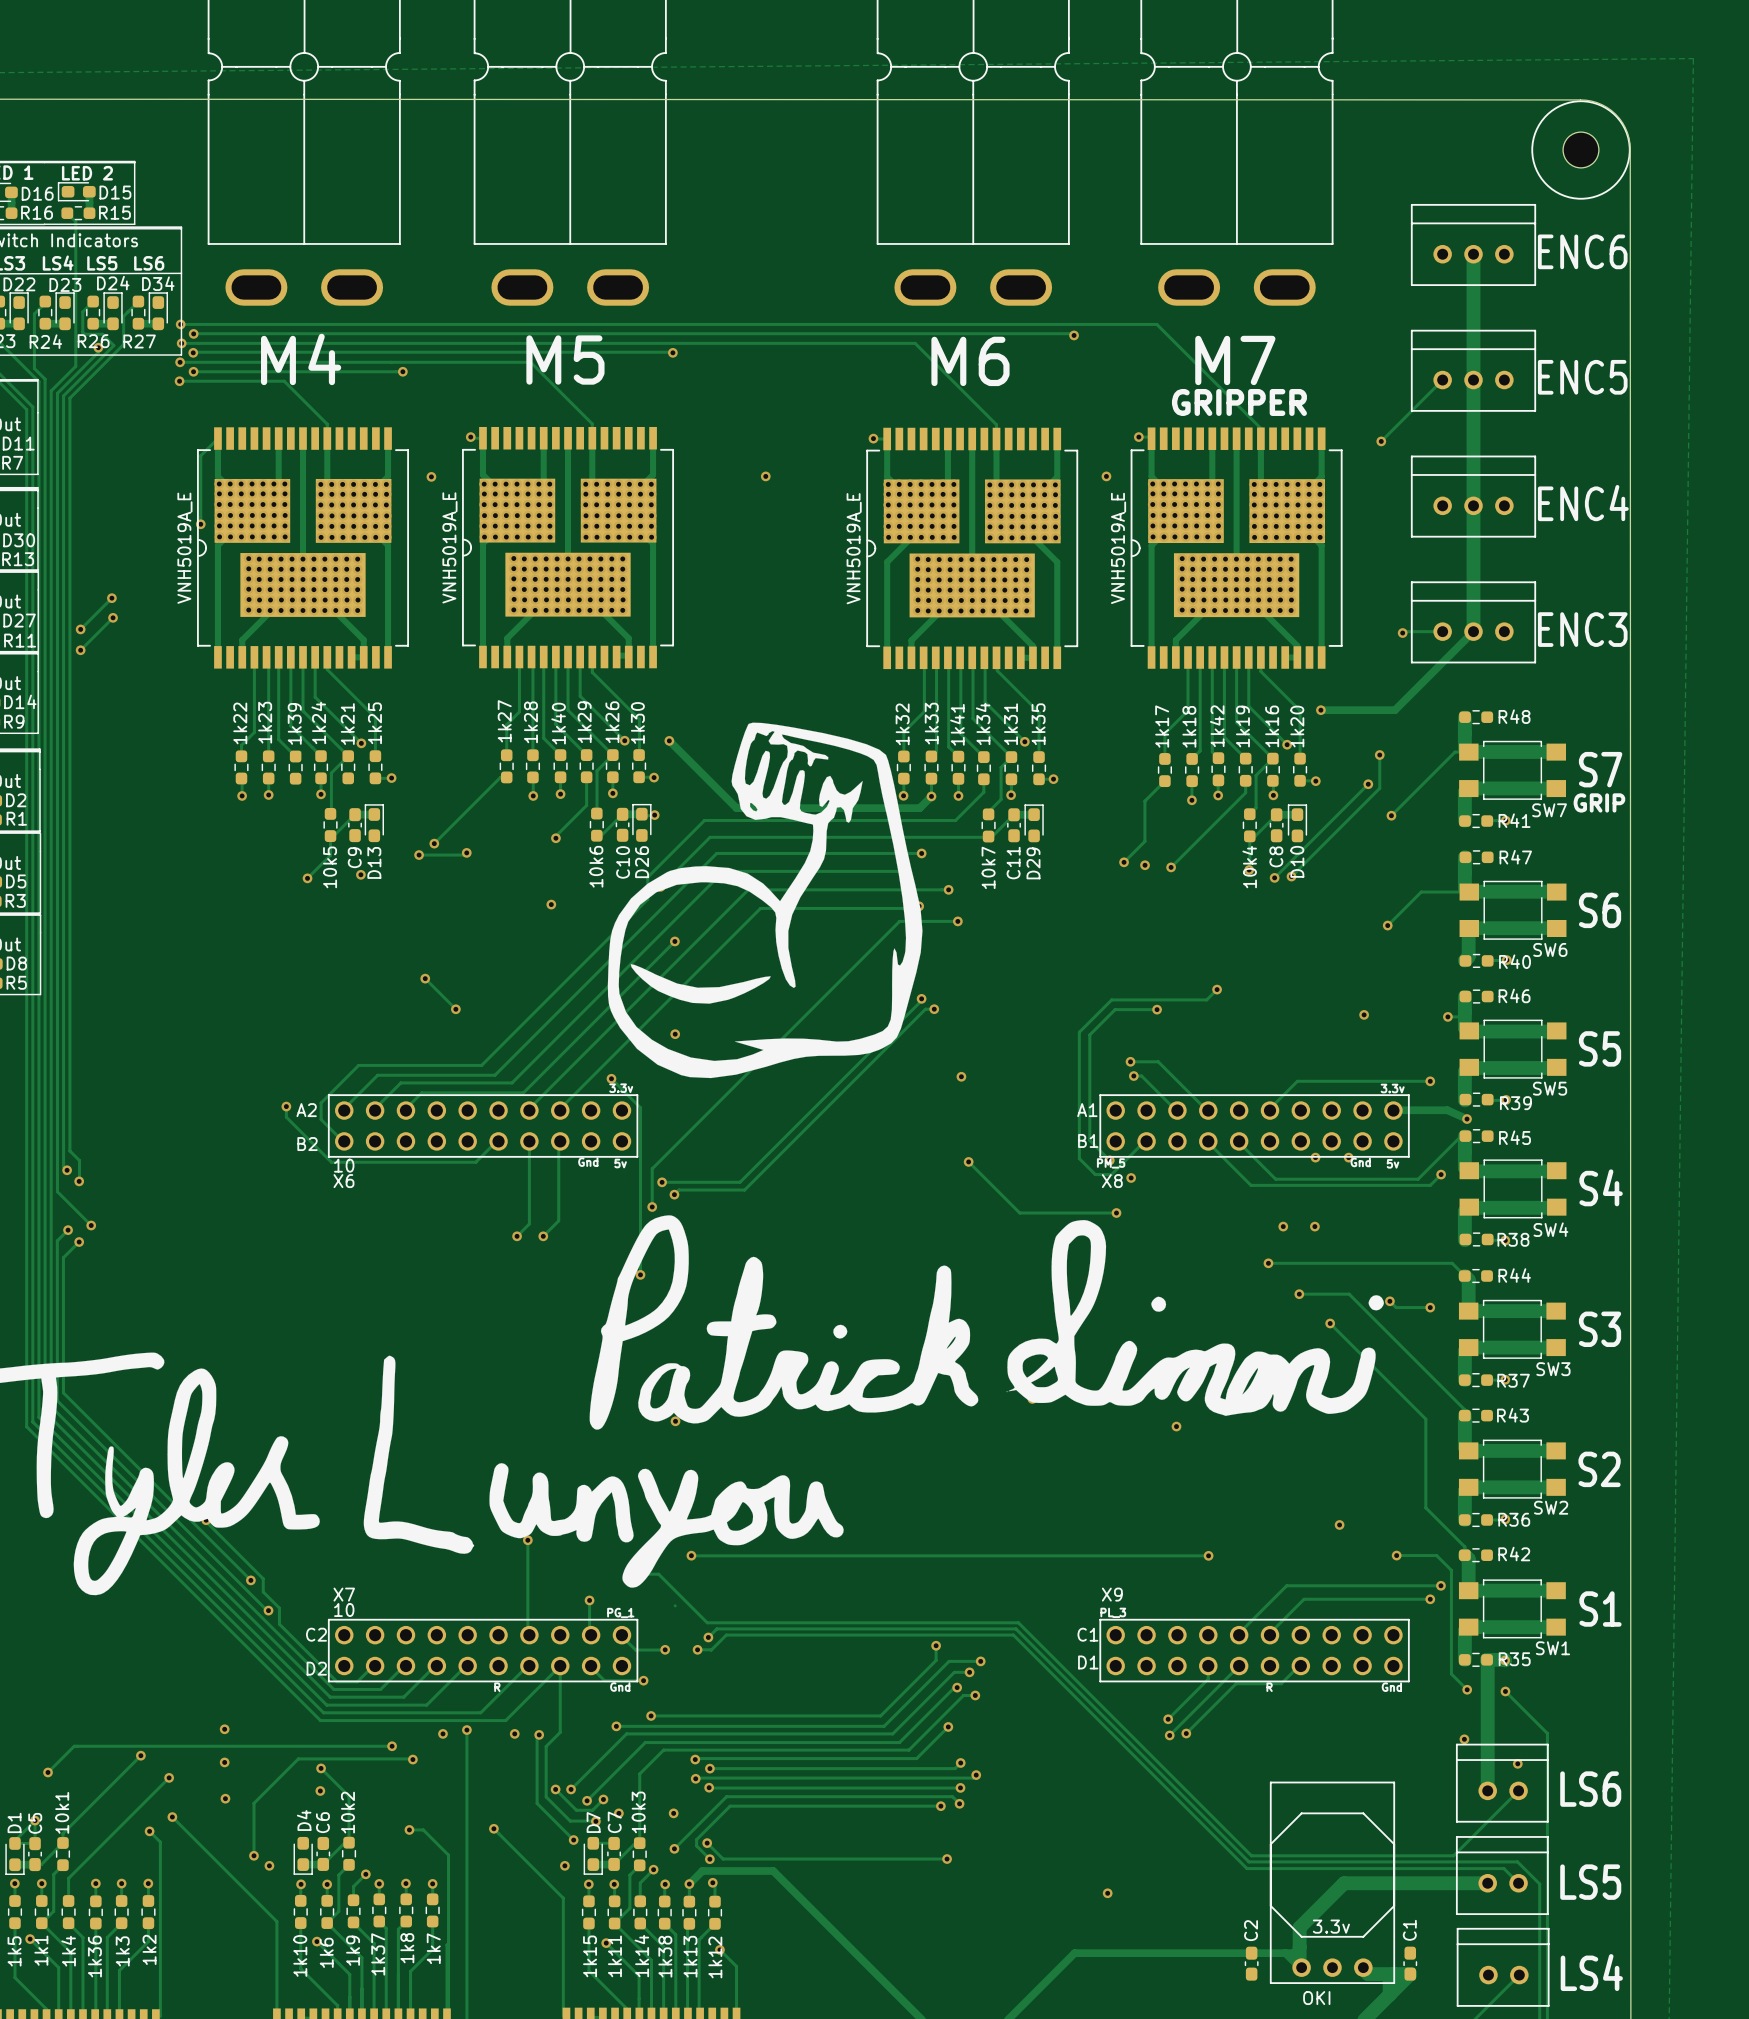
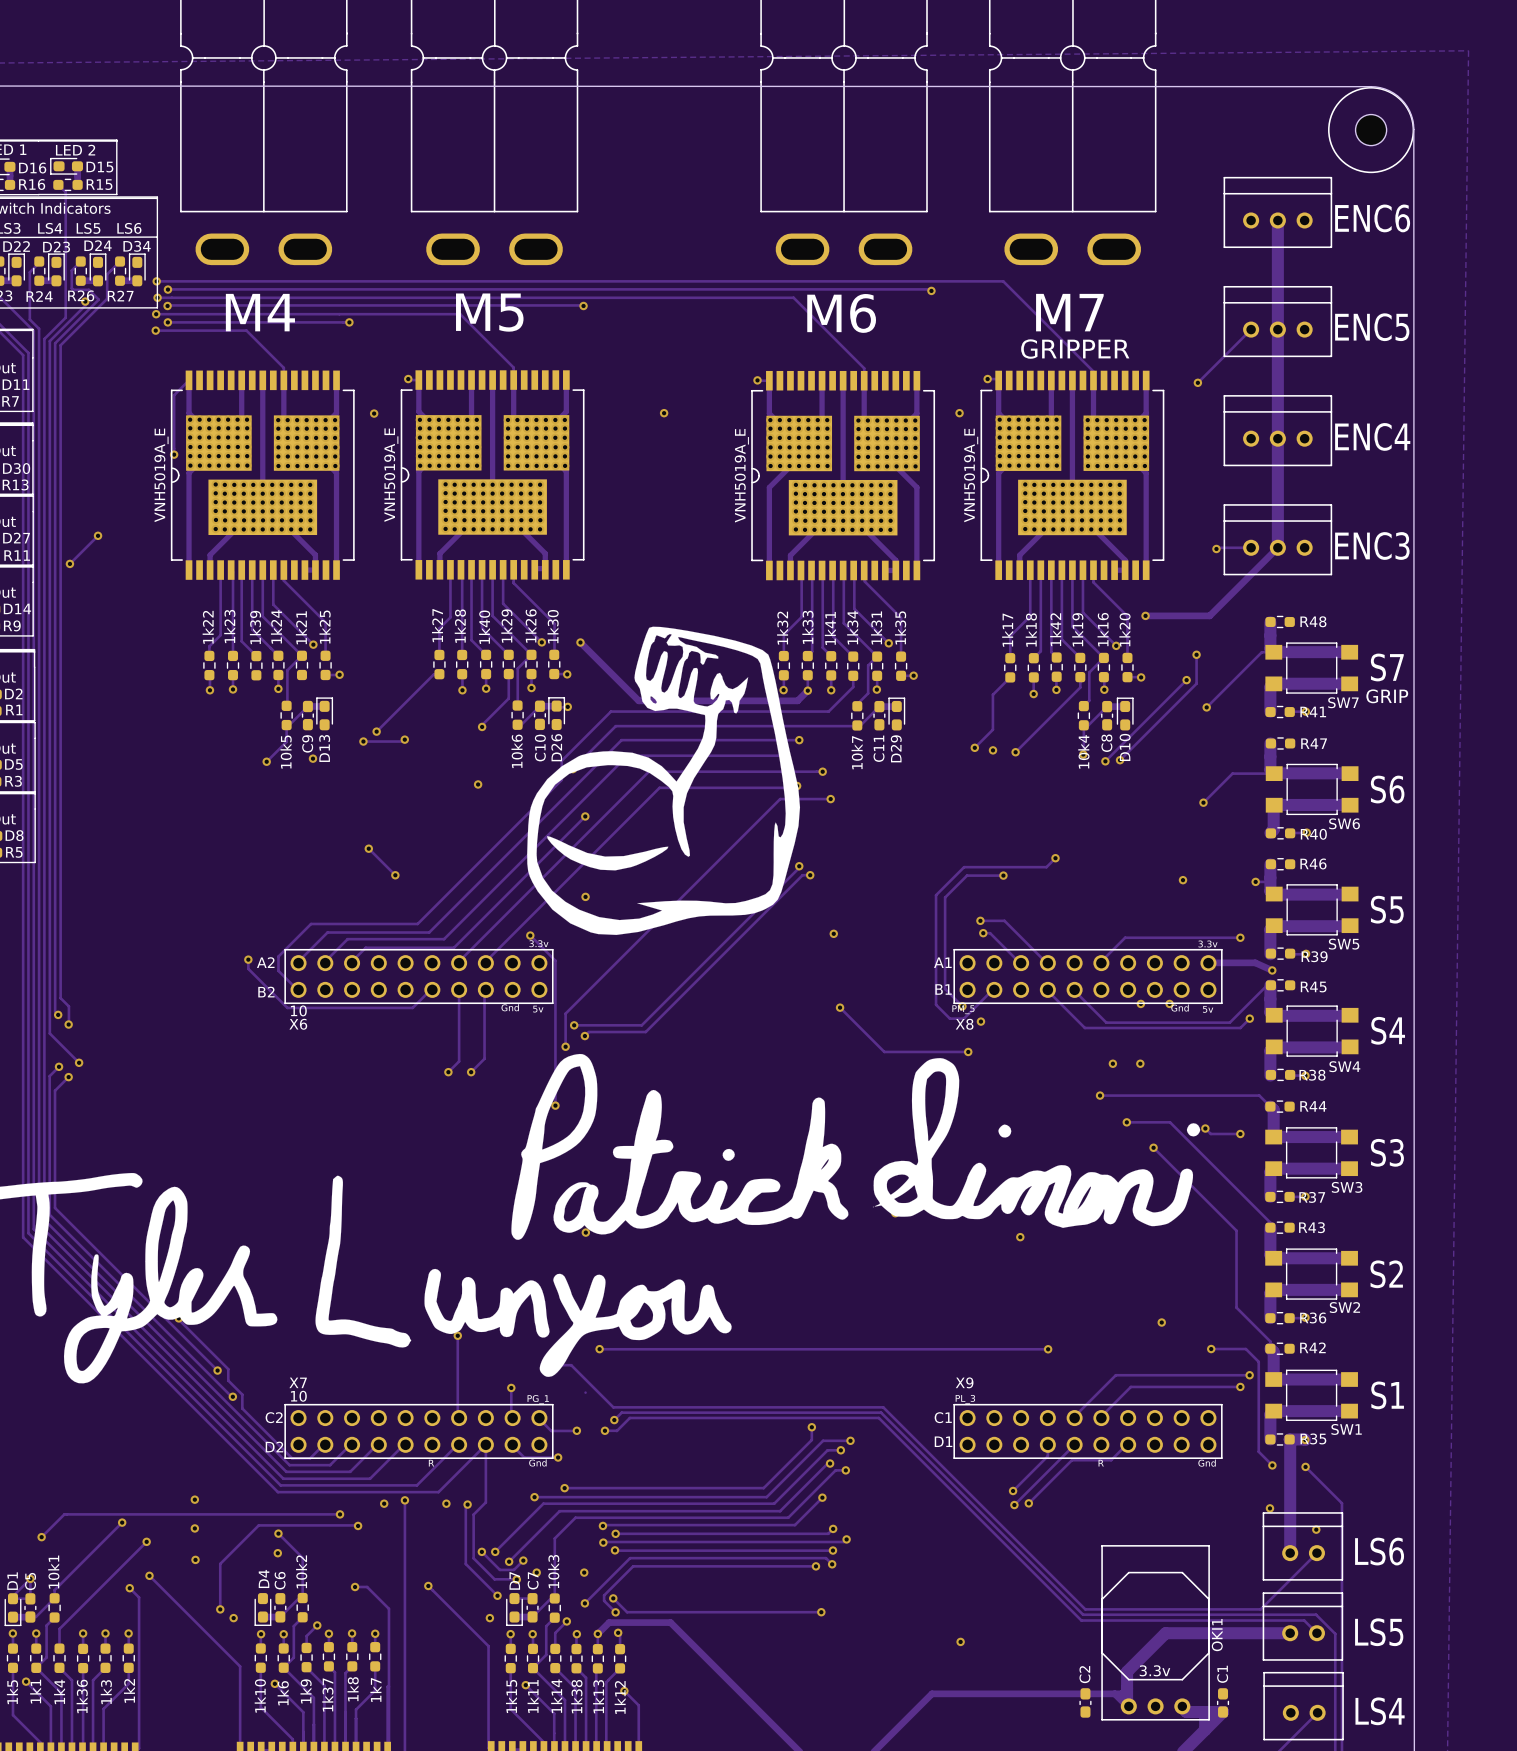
track: (111, 598) (80, 629) -> none
via: (111, 598) -> none
via: (80, 629) -> none
OKI1 name: none -> OKI1 (1217, 1635)
OKI1 value: OKI (1316, 1998) -> none

